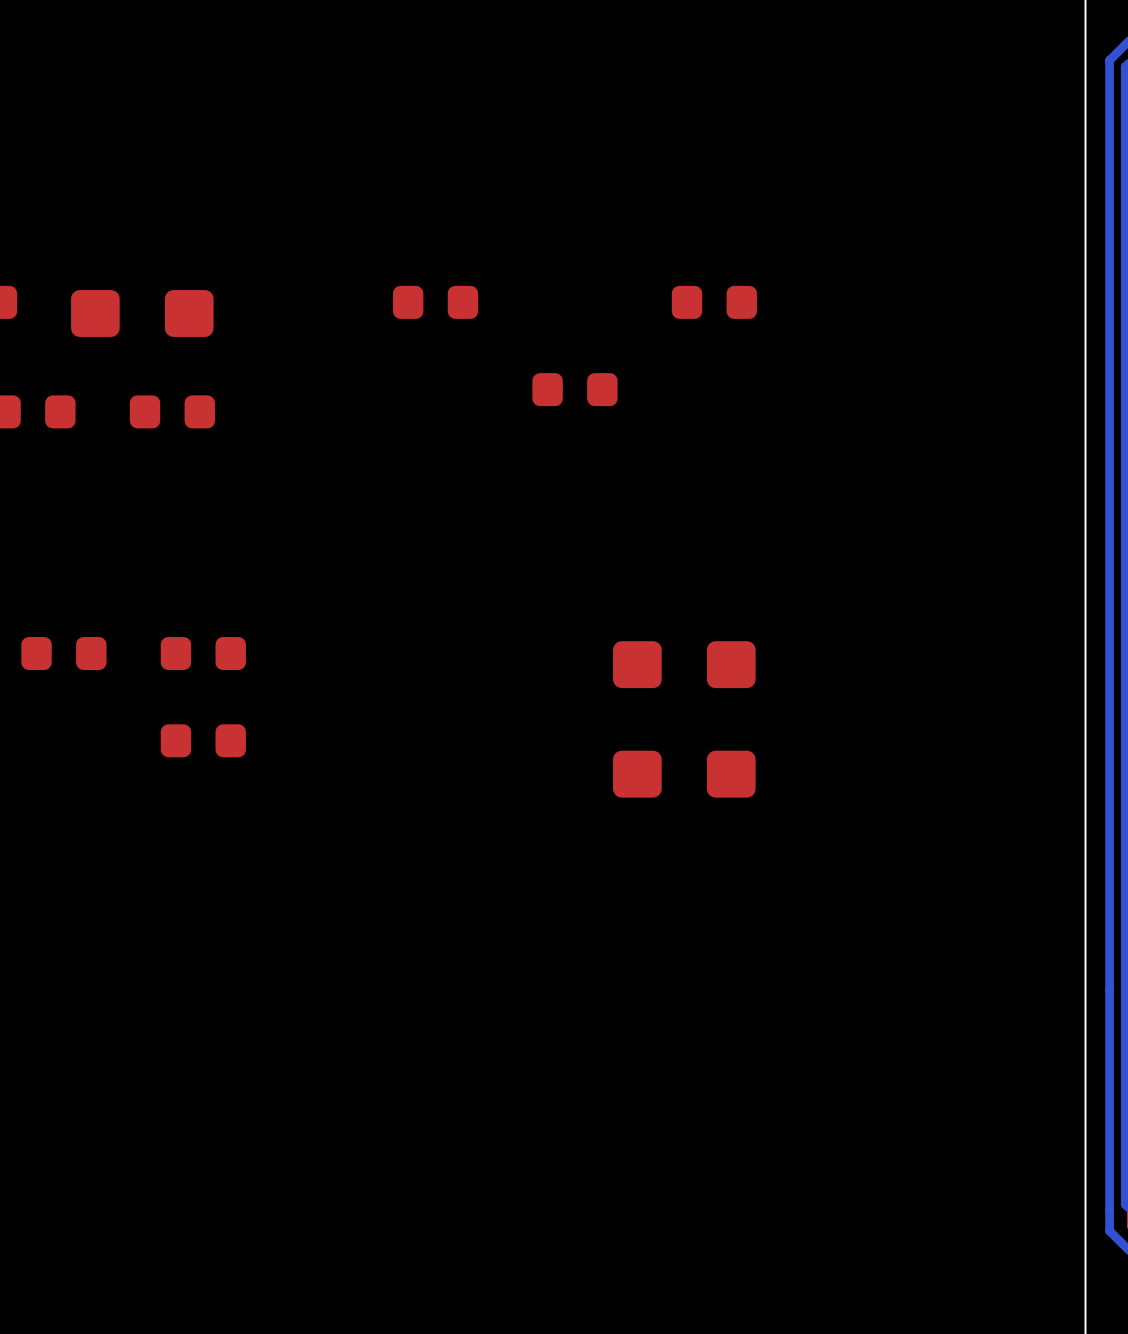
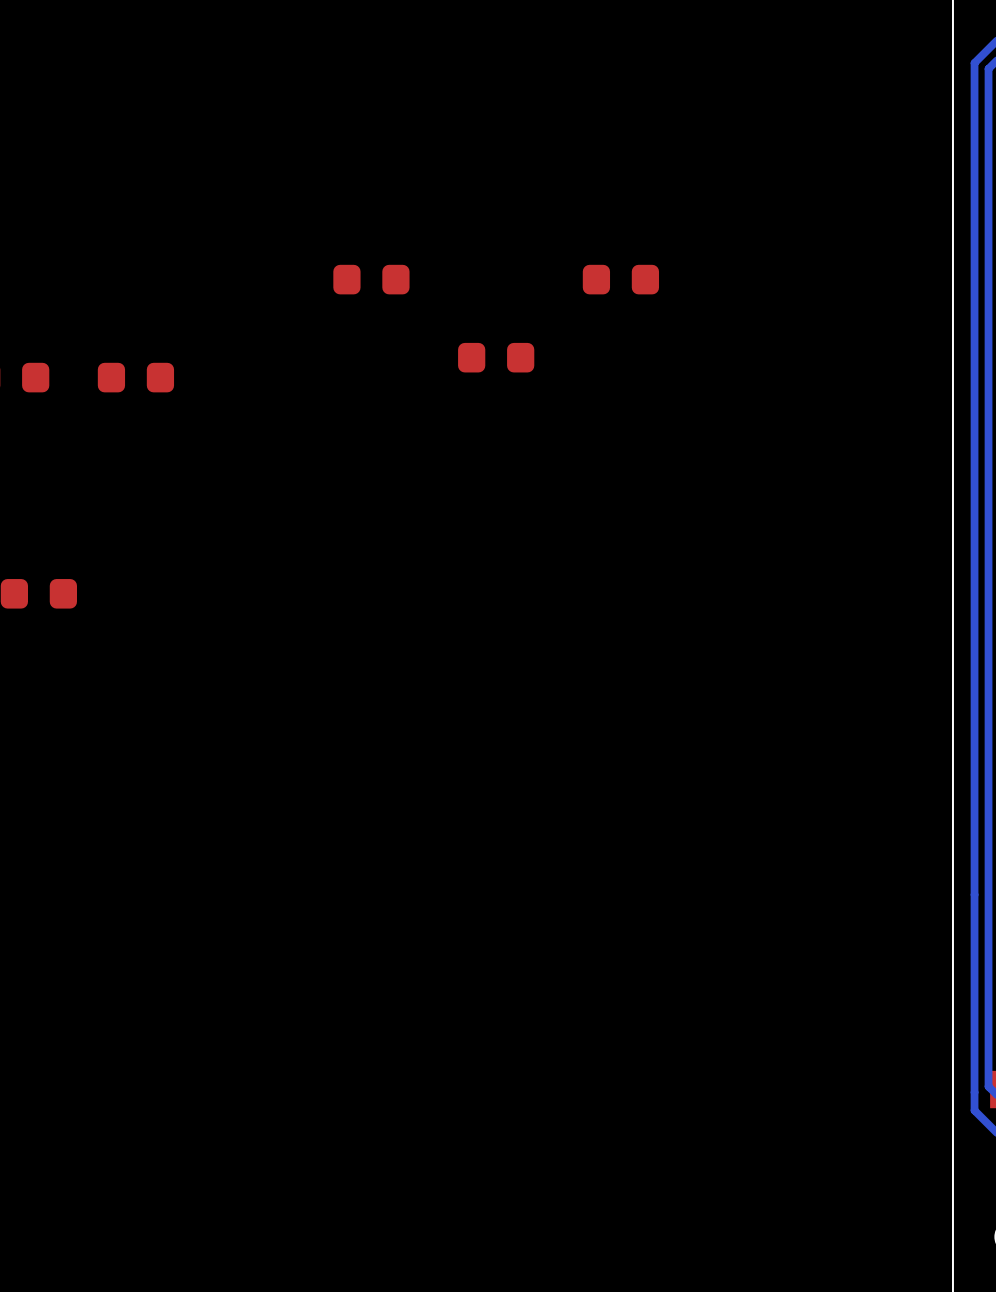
part: (142, 313) -> none
part: (203, 653) -> none
part: (684, 664) -> none
part: (203, 740) -> none
part: (684, 774) -> none

